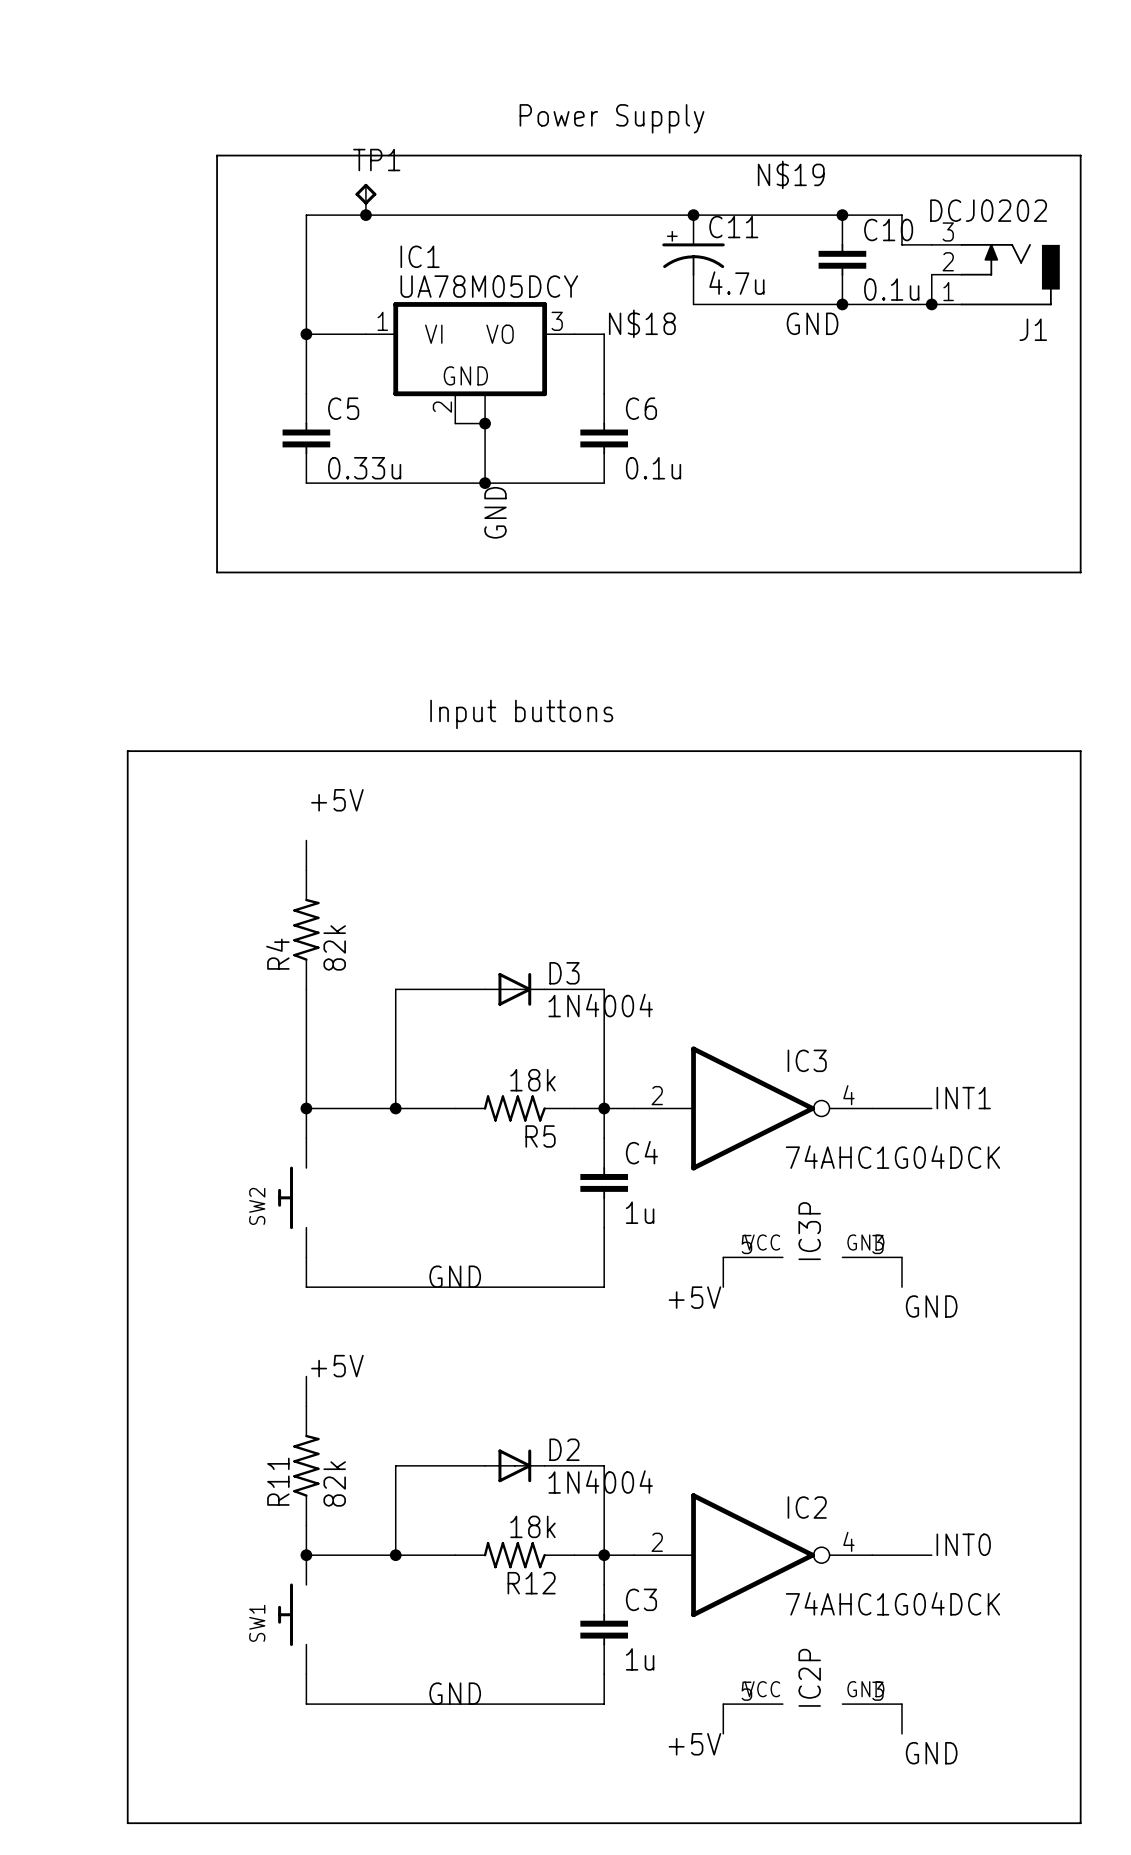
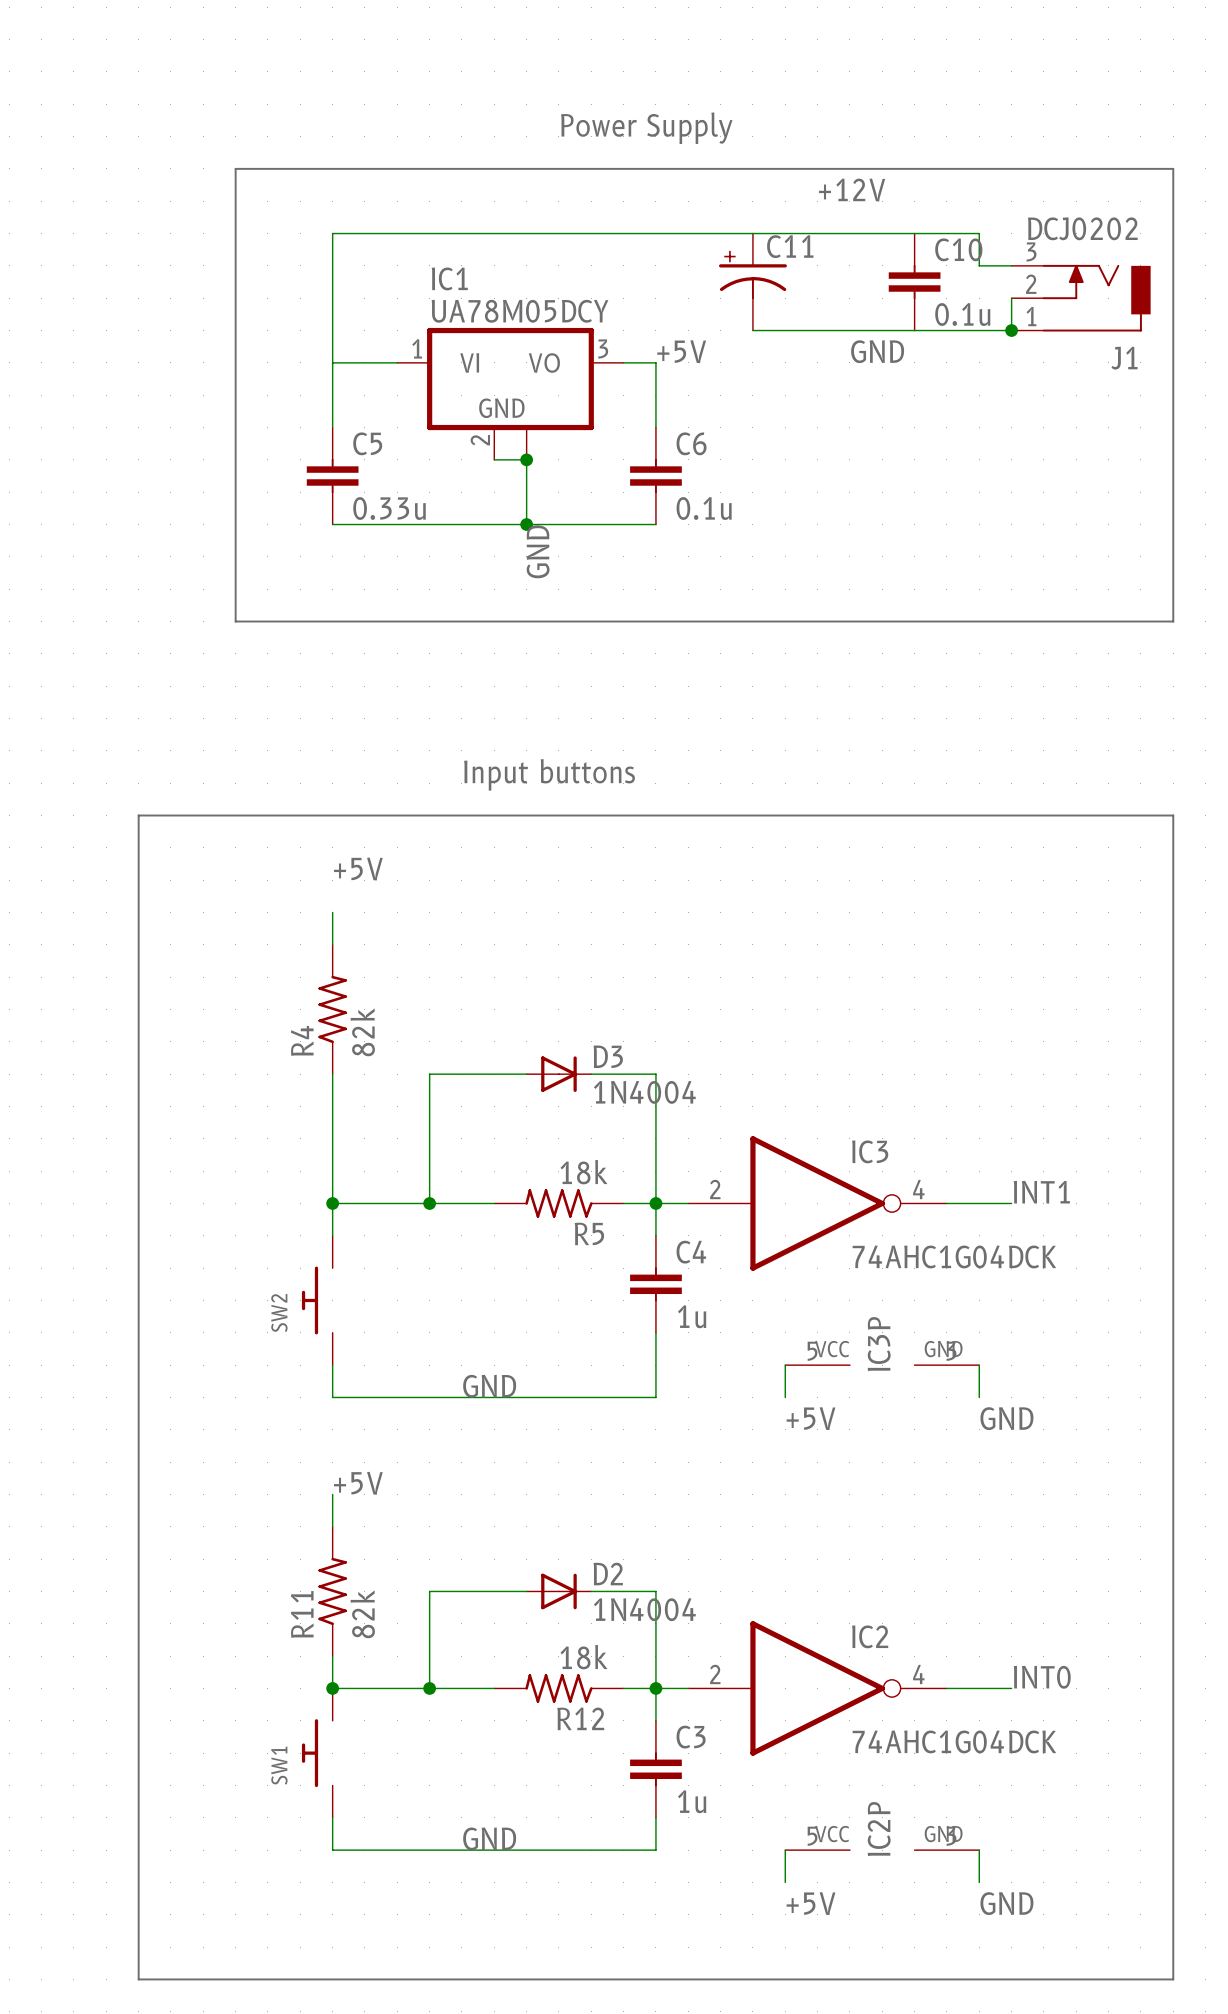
label: N$19 (791, 174) -> +12V (852, 190)
TP1: (365, 199) -> none
junction: (365, 215) -> none
junction: (693, 215) -> none
junction: (842, 215) -> none
C11 value: 4.7u (736, 283) -> none
junction: (842, 304) -> none
label: N$18 (642, 323) -> +5V (681, 351)
junction: (306, 334) -> none
label position: +5V (694, 1297) -> +5V (811, 1418)
label position: +5V (694, 1744) -> +5V (811, 1903)

